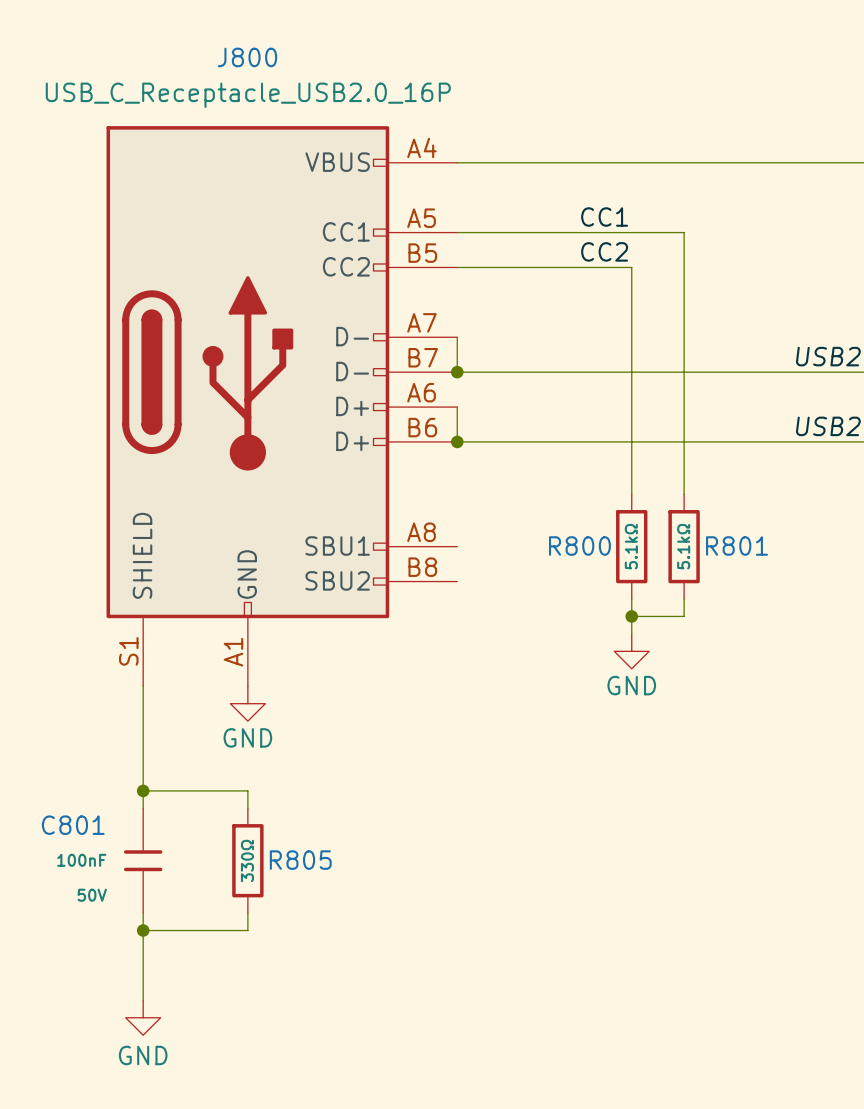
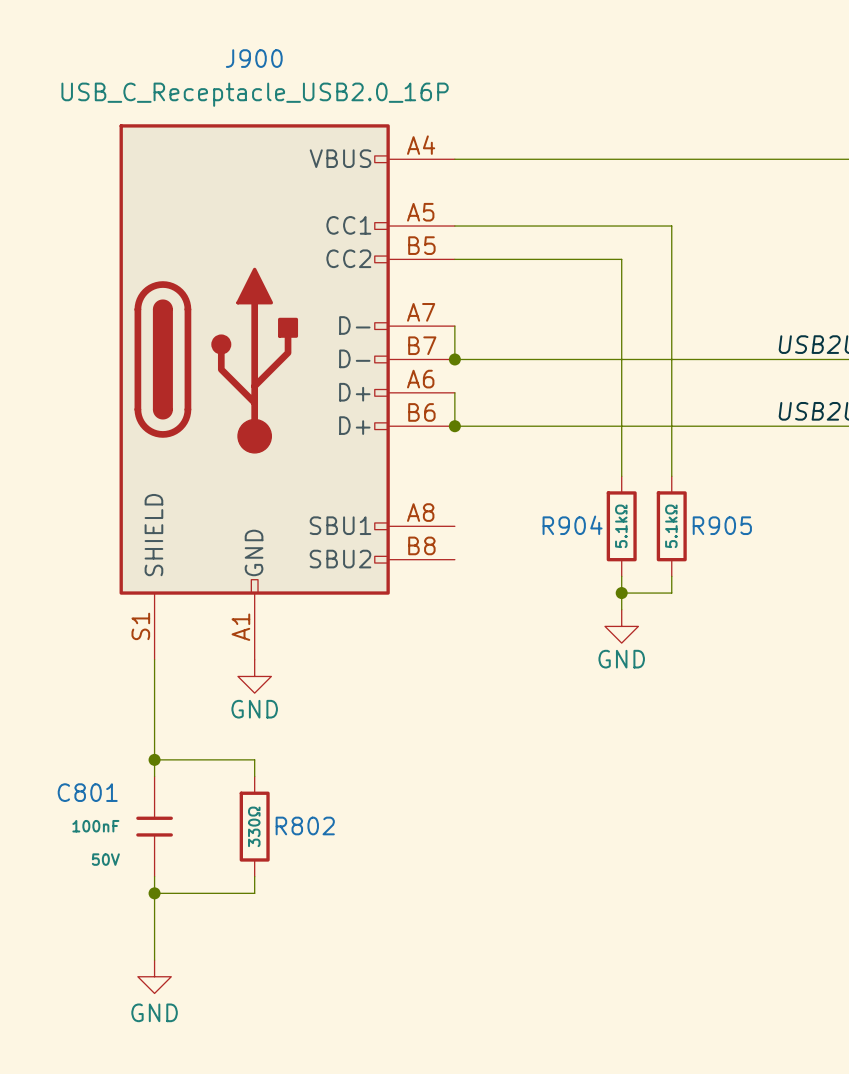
J800 name: J800 (247, 57) -> J900 (254, 58)
label: CC1 (604, 217) -> none
label: CC2 (604, 251) -> none
R800 name: R800 (579, 546) -> R904 (572, 525)
R801 name: R801 (736, 546) -> R905 (722, 525)
R805 name: R805 (300, 860) -> R802 (305, 825)

